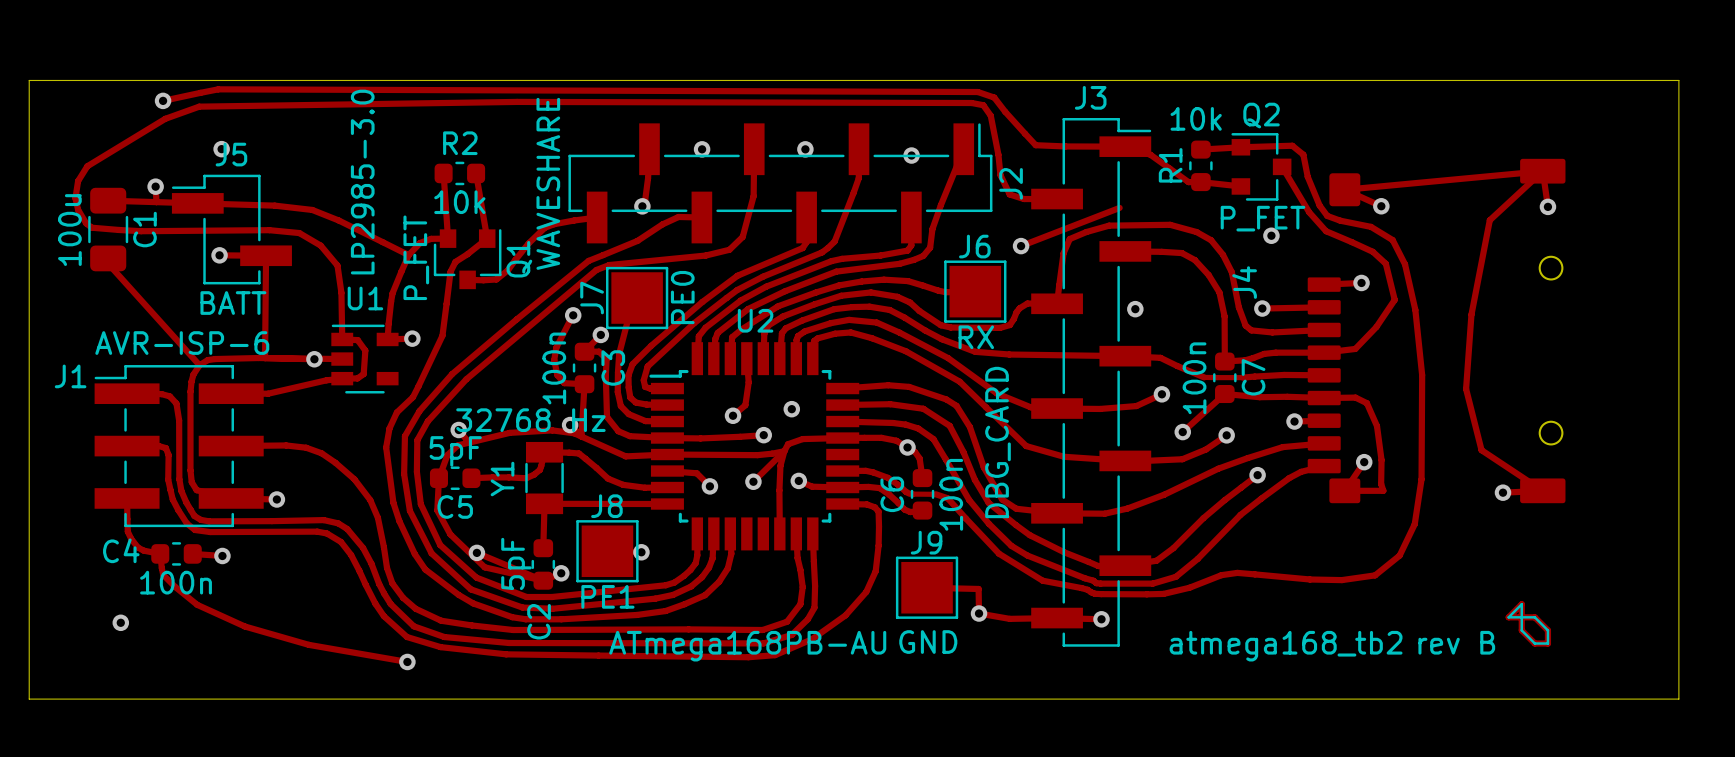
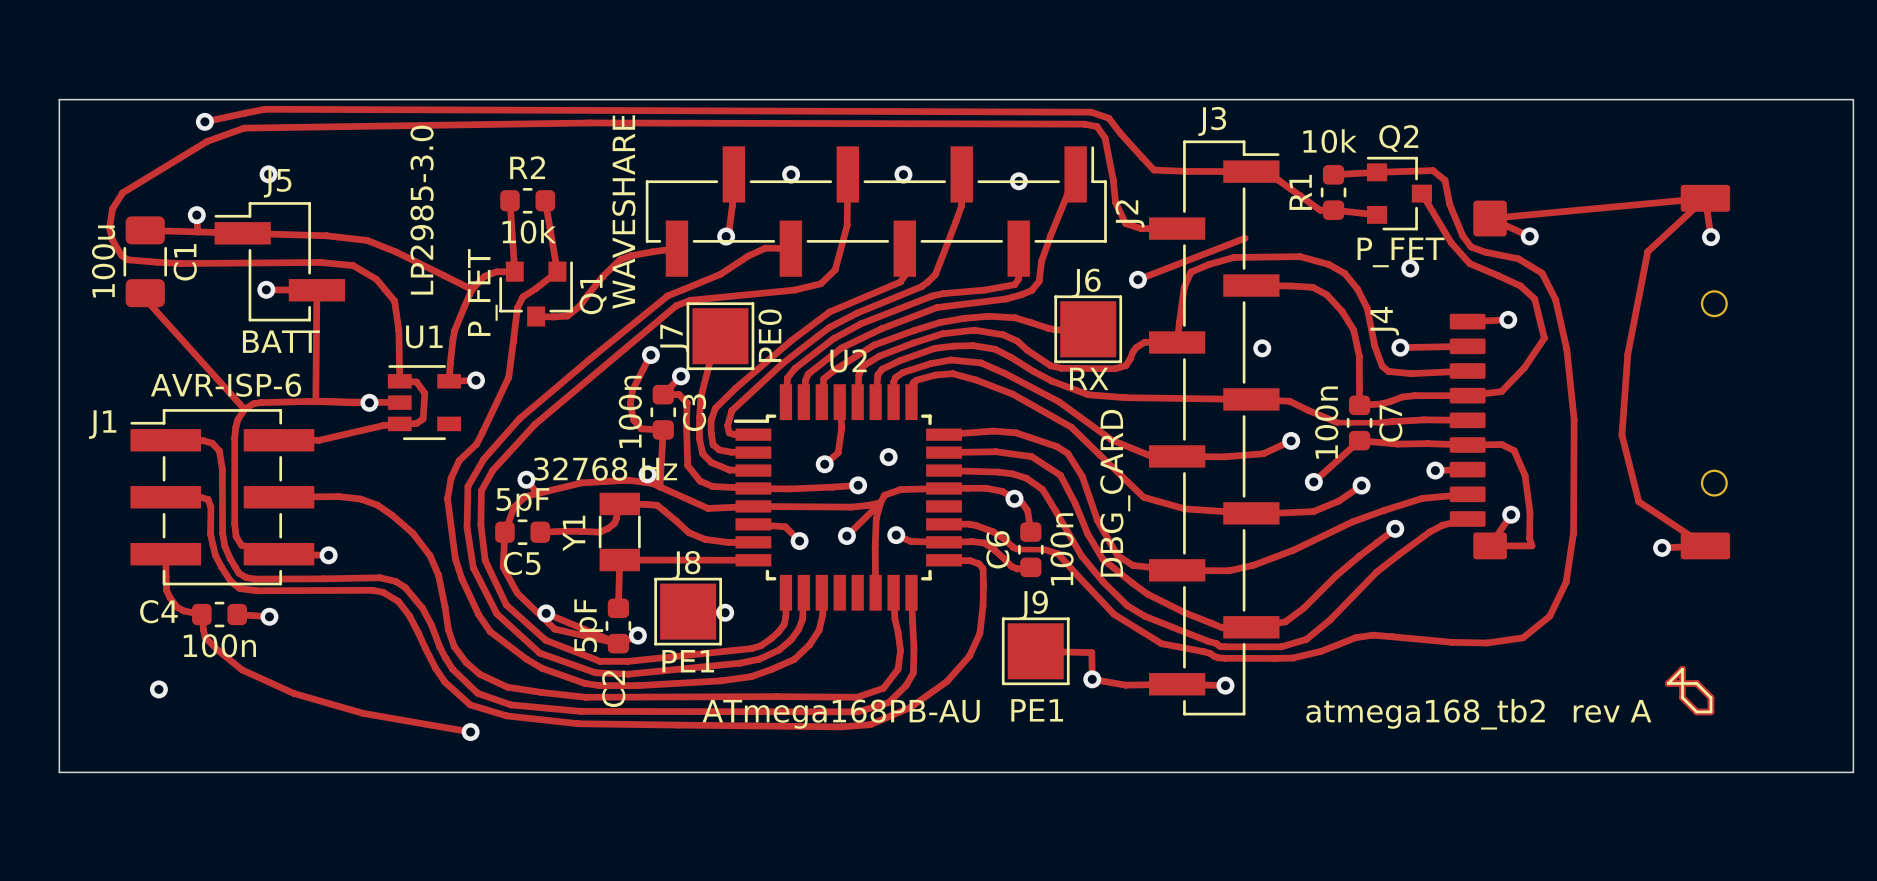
J9 value: GND (928, 642) -> PE1 (1037, 710)
text: rev B (1456, 642) -> rev A (1612, 711)

